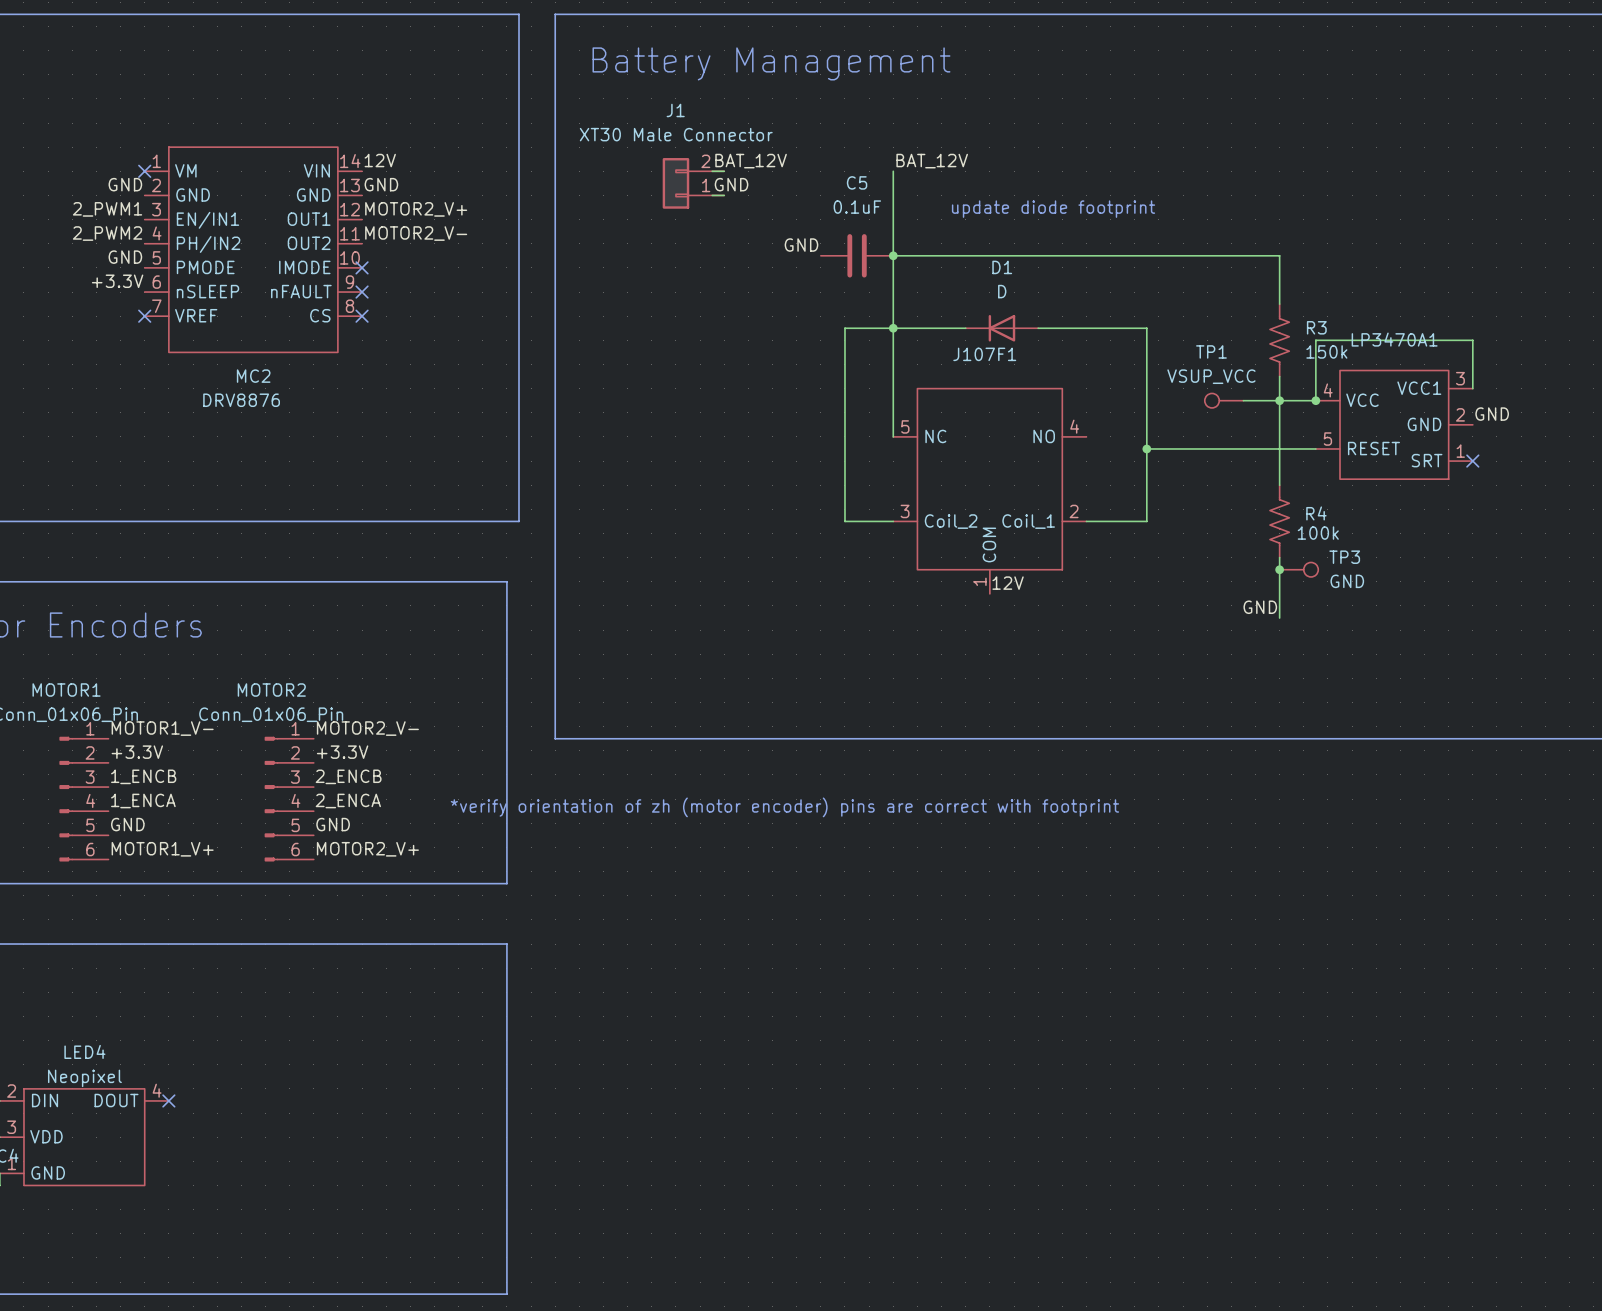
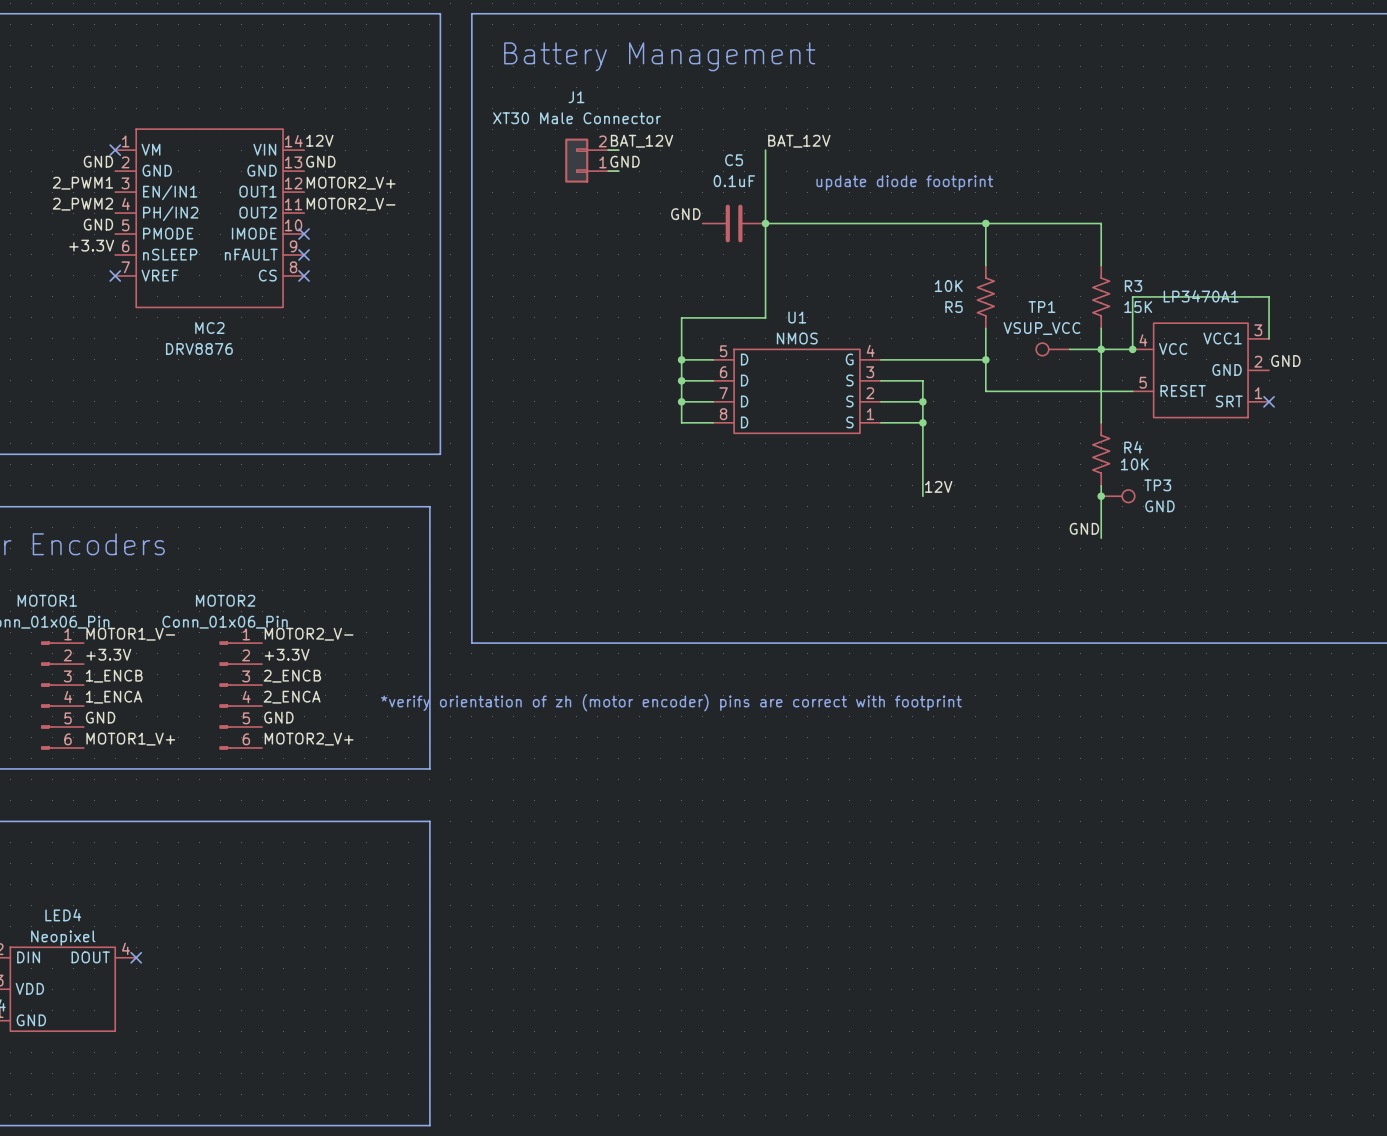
wire: none -> (985, 223) (985, 265)
junction: none -> (985, 223)
junction: (893, 328) -> none
wire: (965, 328) (844, 328) (844, 521) (893, 521) -> none
D1: D (1001, 328) -> none
wire: (1038, 328) (1146, 328) (1146, 376) -> none
R5: none -> 10K (985, 296)
R3 value: 150k (1326, 351) -> 15K (1138, 307)
wire: (893, 364) (893, 436) -> (765, 317) (681, 317) (681, 422) (713, 422)
wire: none -> (681, 359) (713, 359)
junction: none -> (681, 359)
wire: none -> (880, 359) (985, 359)
wire: none -> (681, 380) (713, 380)
junction: none -> (681, 380)
wire: none -> (880, 380) (922, 380) (922, 496)
U1: none -> NMOS (797, 391)
wire: (1146, 448) (1146, 521) (1086, 521) -> none
junction position: (1146, 448) -> (985, 359)
wire: none -> (681, 401) (713, 401)
junction: none -> (681, 401)
wire: none -> (880, 401) (922, 401)
junction: none -> (922, 401)
wire: none -> (880, 422) (922, 422)
junction: none -> (922, 422)
J107F1: (989, 491) -> none
R4 value: 100k (1318, 533) -> 10K (1134, 464)
label position: 12V (1008, 583) -> 12V (938, 486)

